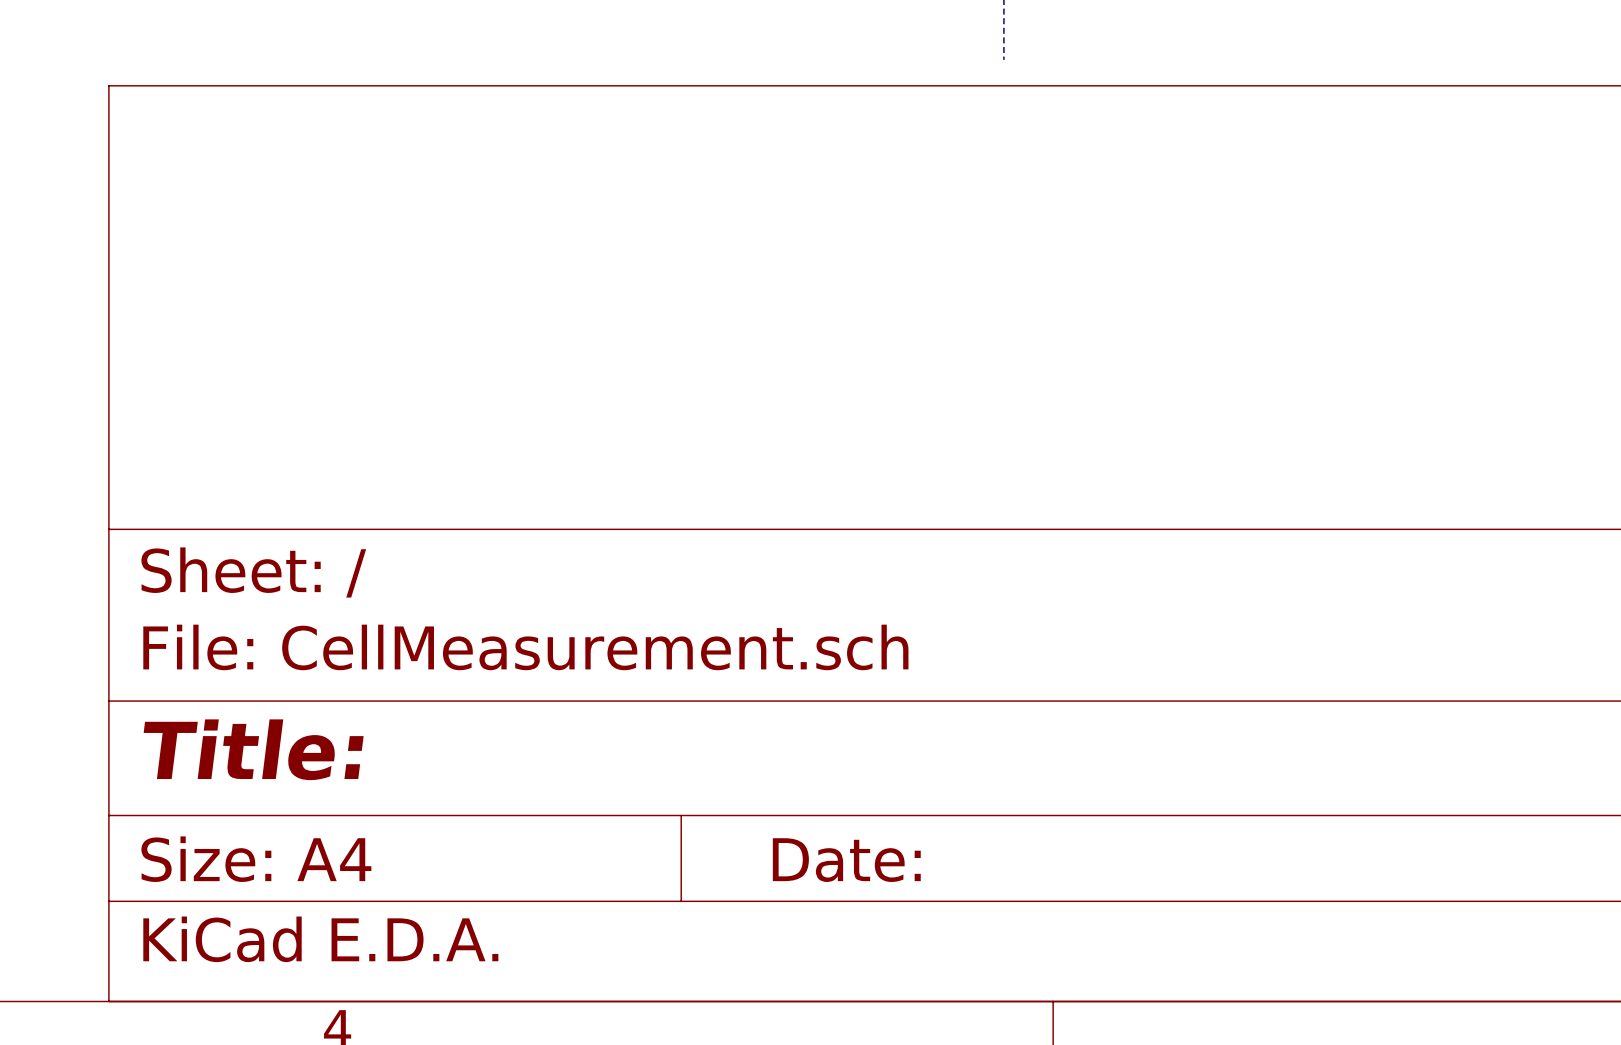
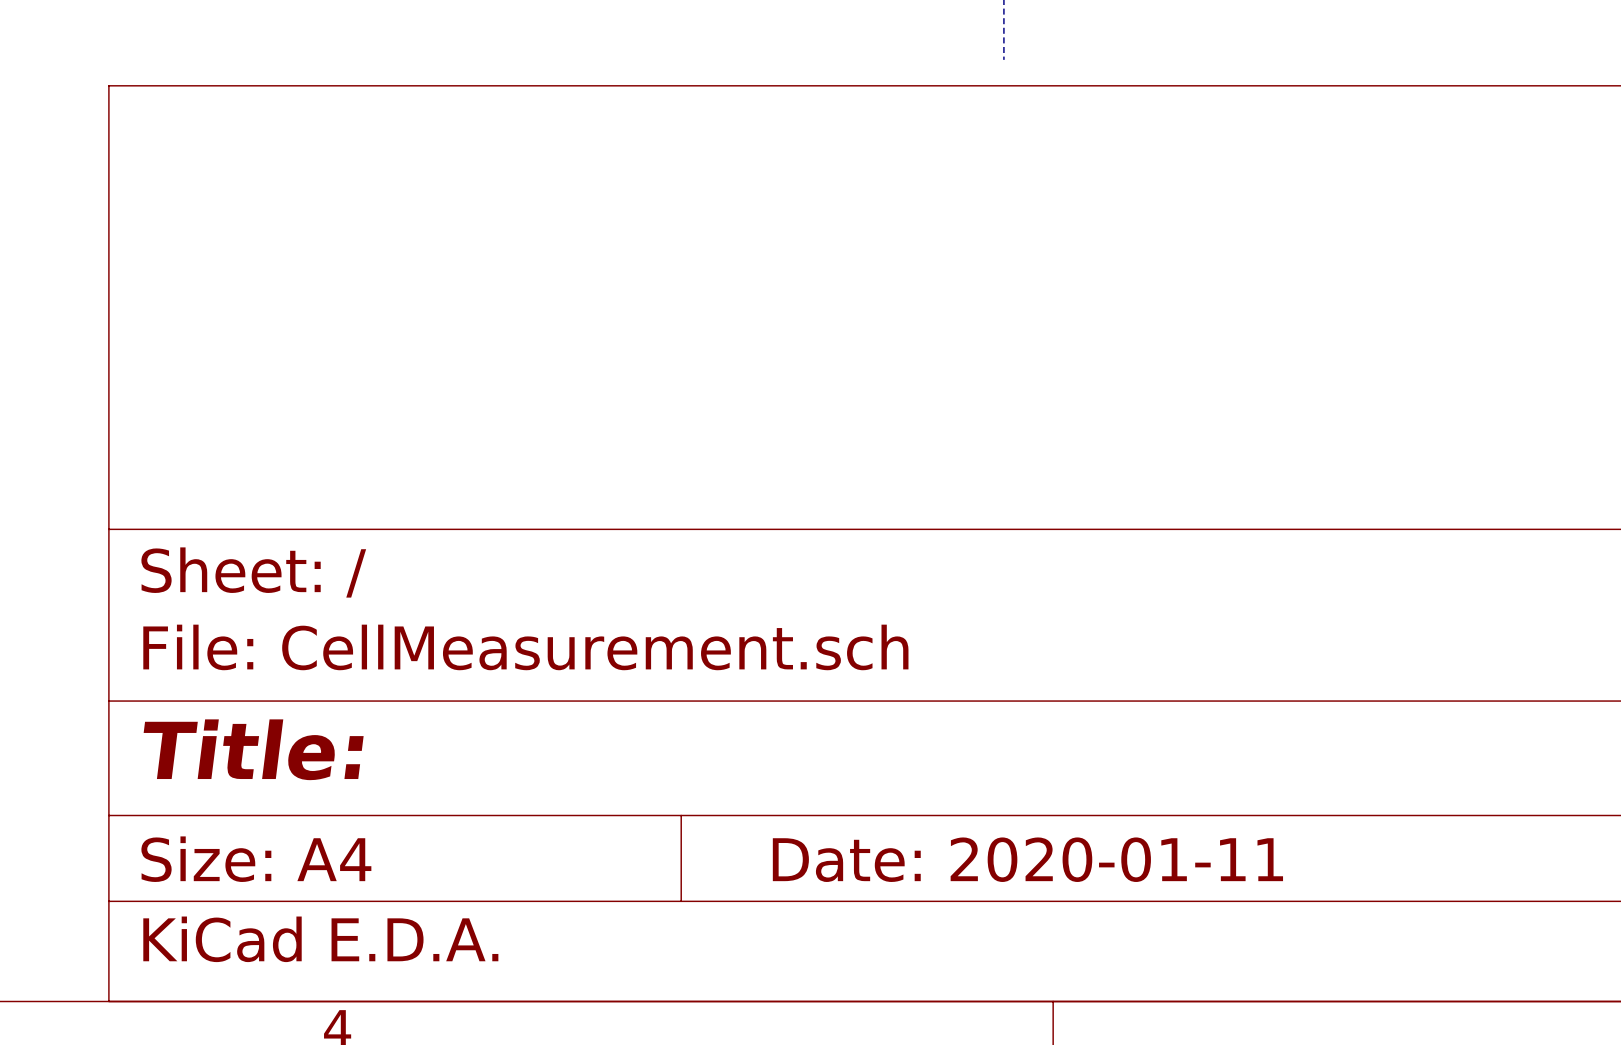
title block: Date: (846, 860) -> Date: 2020-01-11 (1027, 859)

